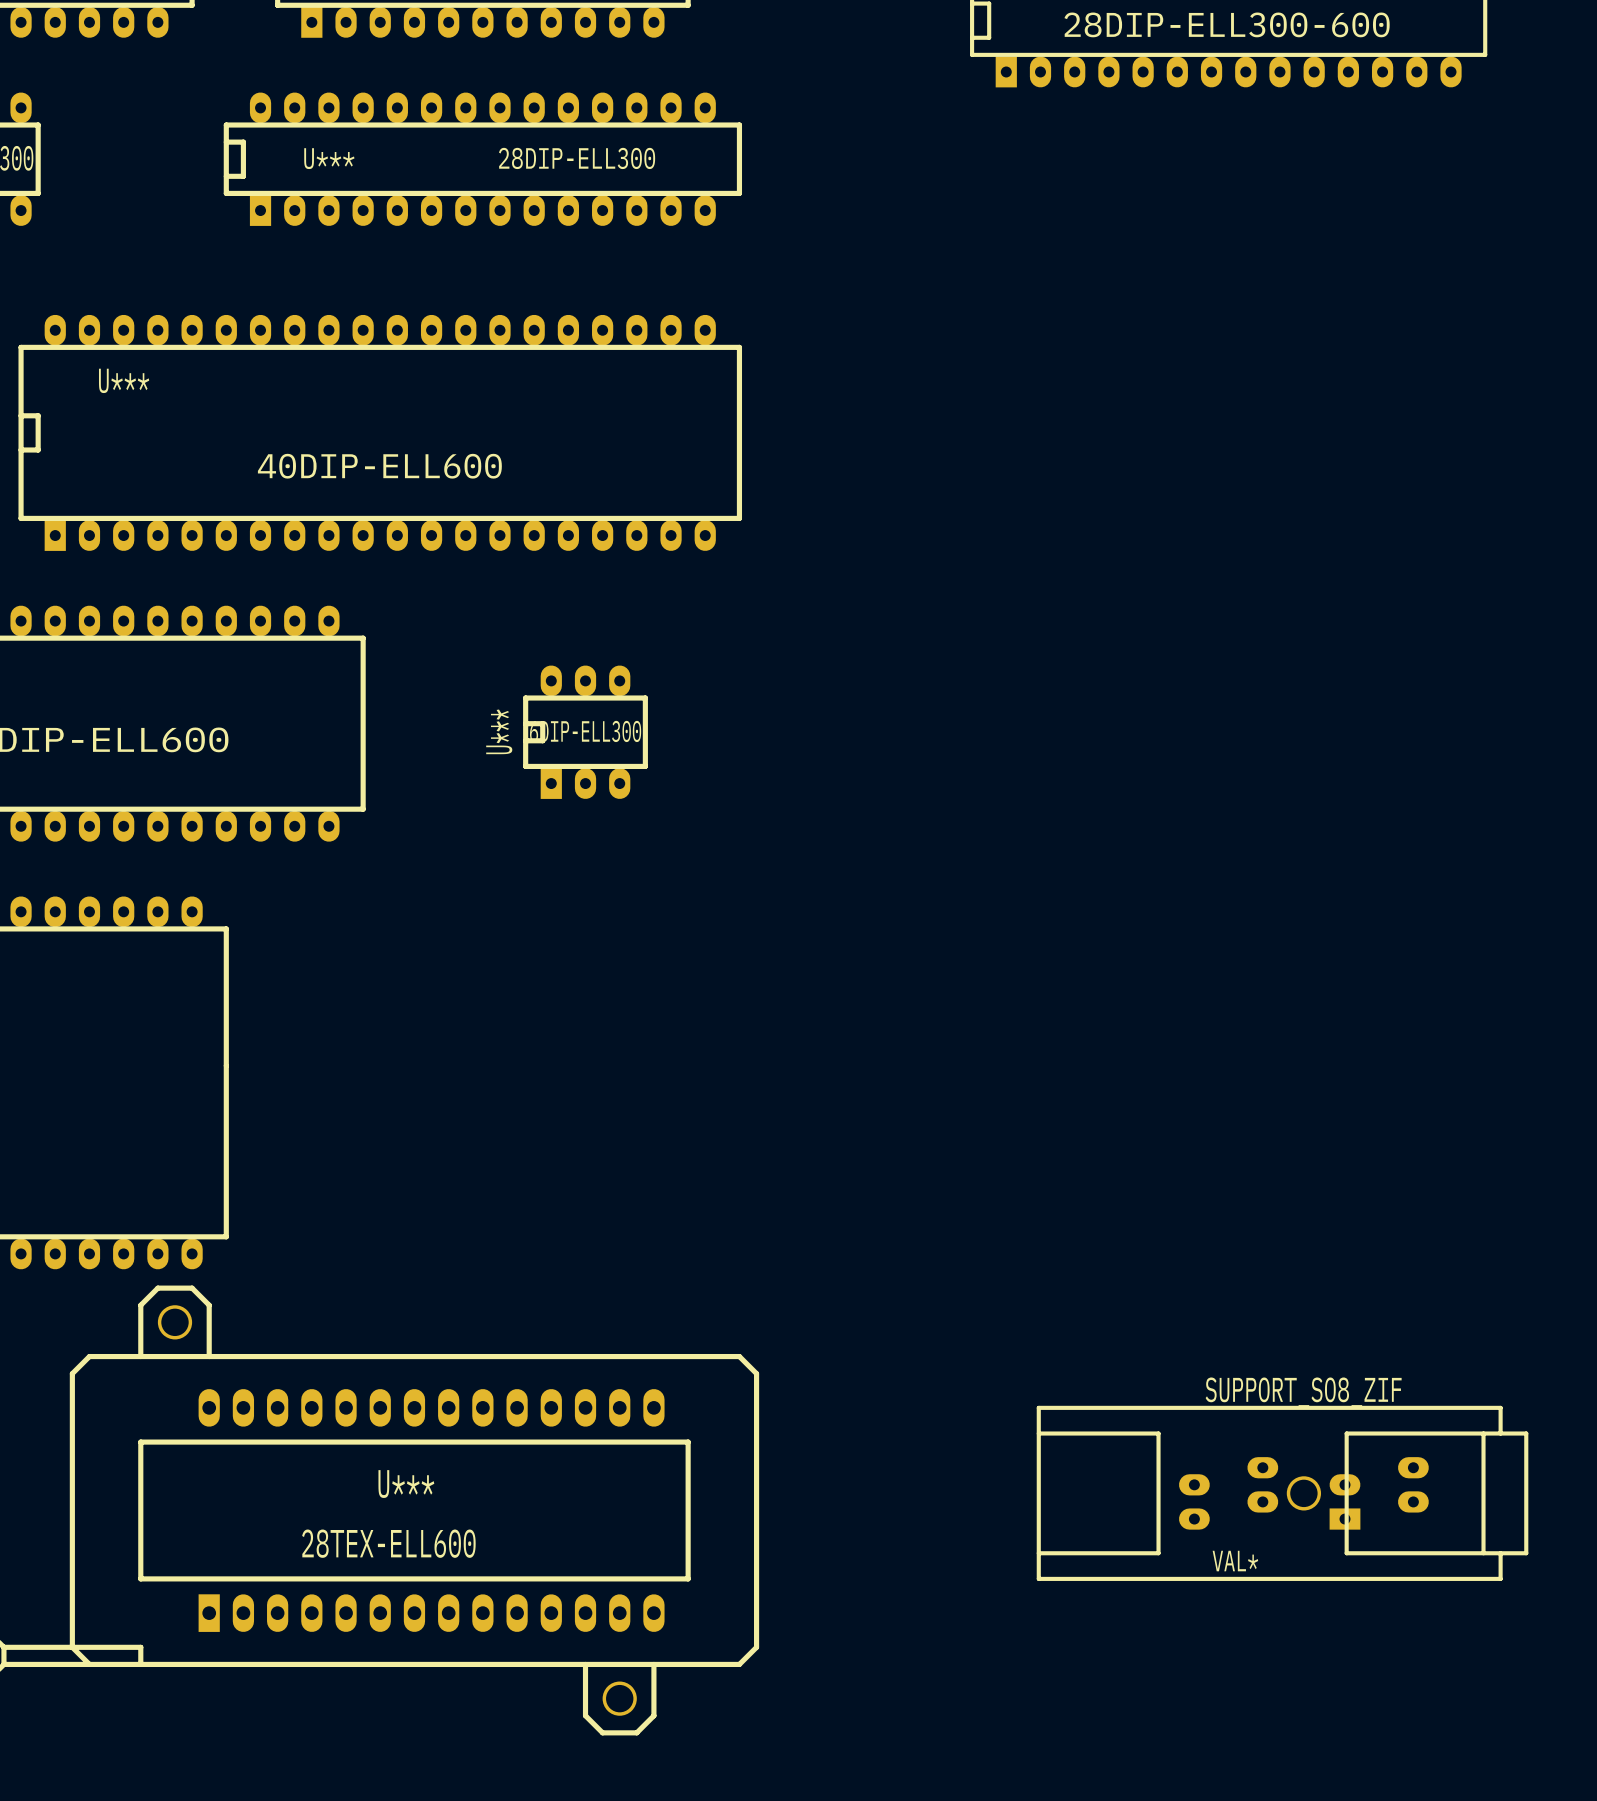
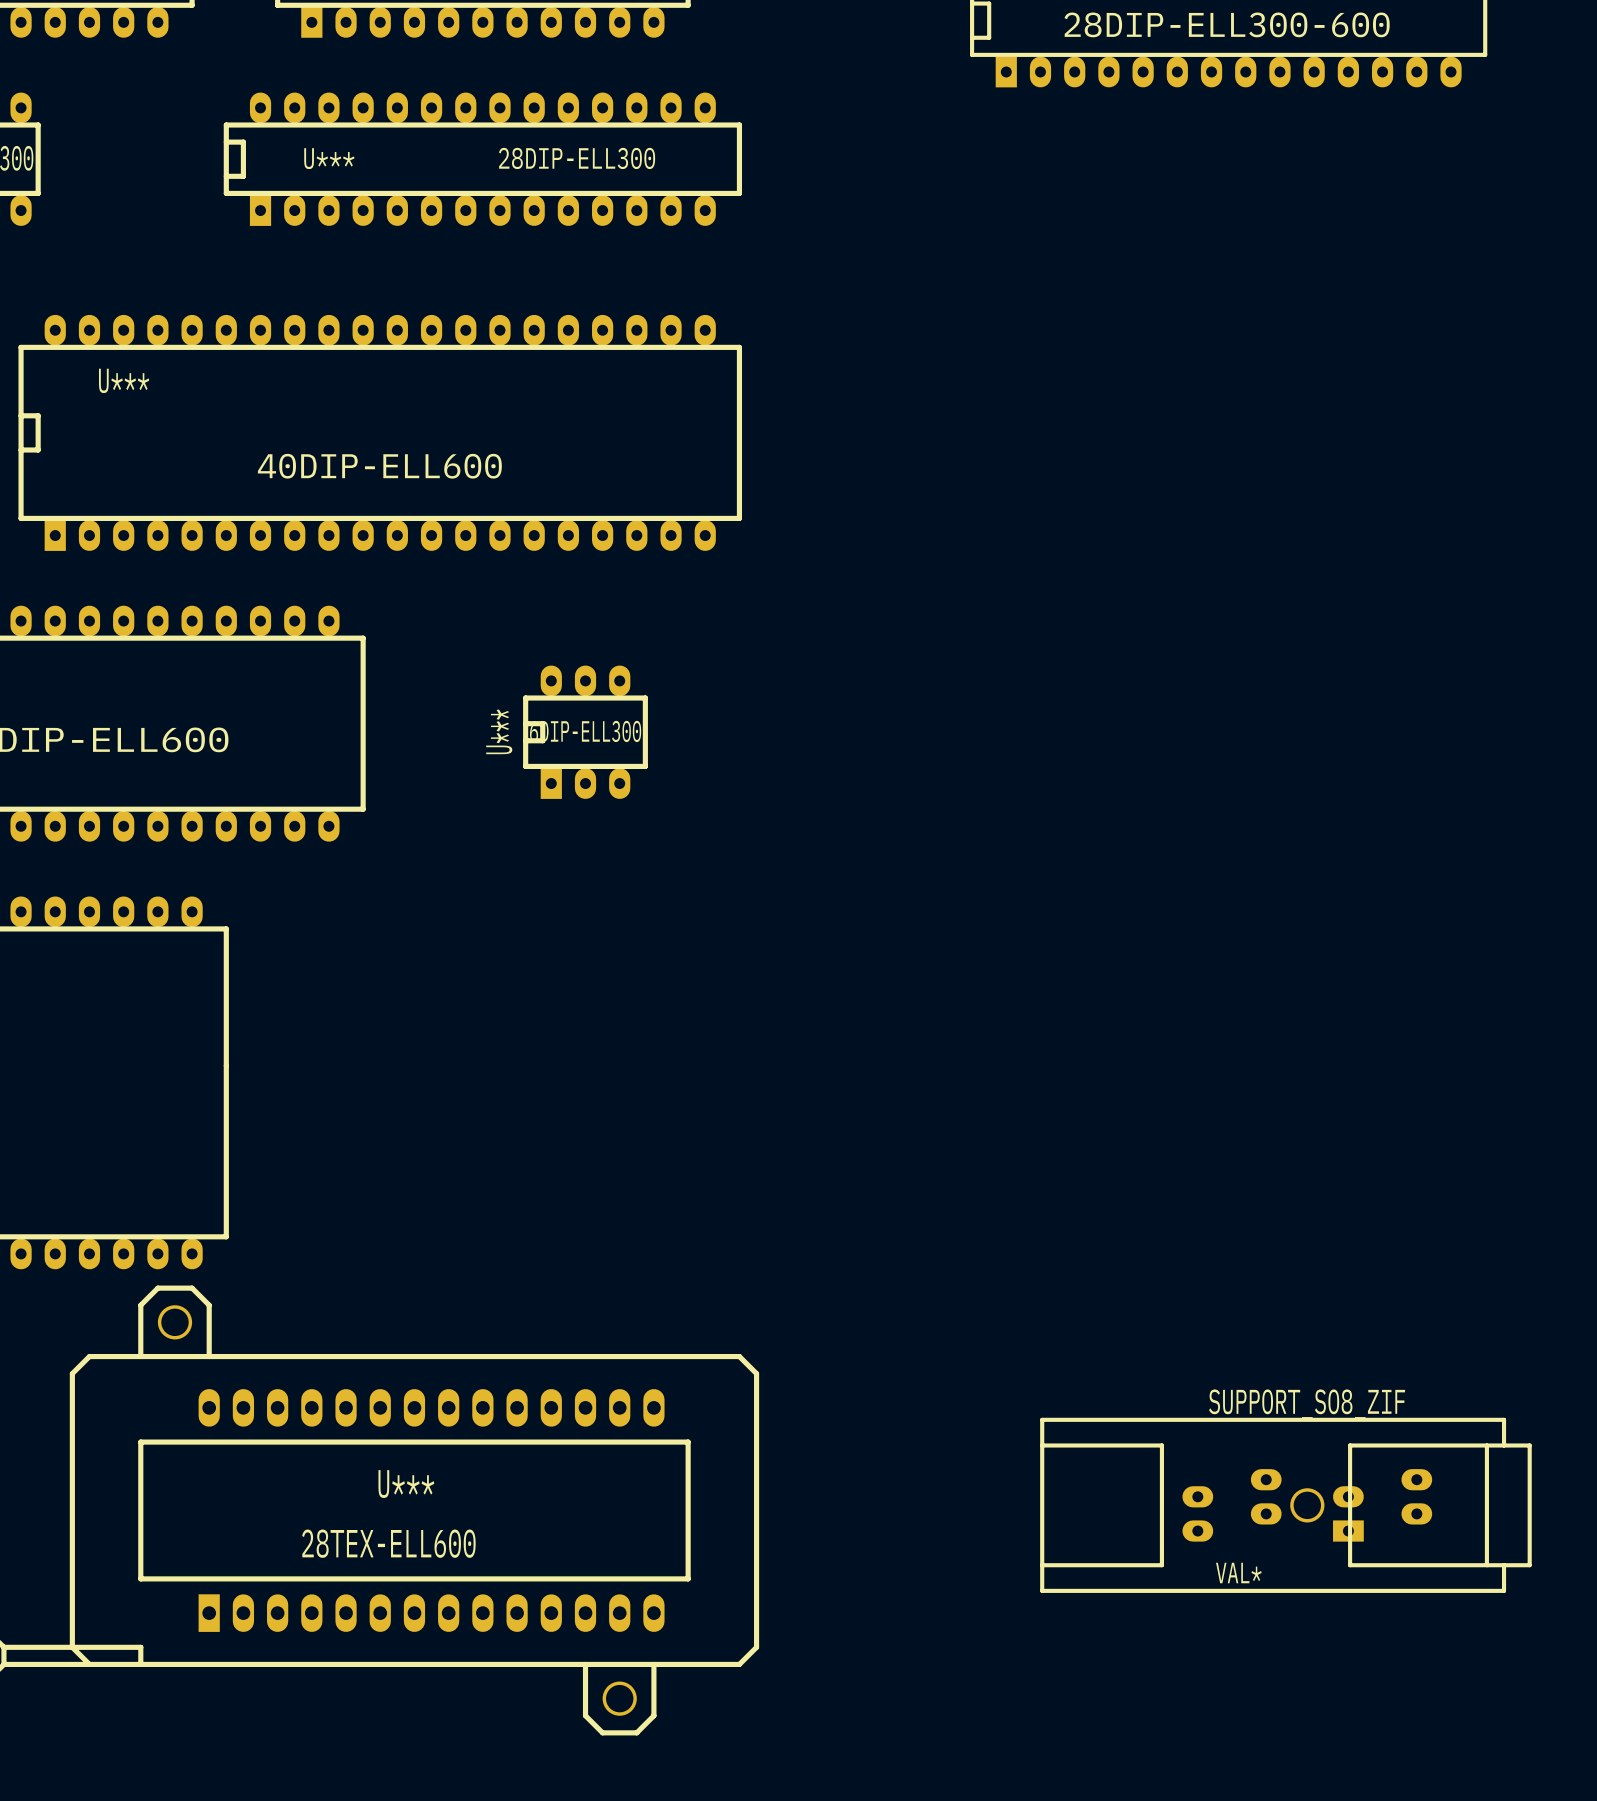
SUPPORT_SO8_ZIF name position: SUPPORT_SO8_ZIF (1303, 1392) -> SUPPORT_SO8_ZIF (1307, 1404)
SUPPORT_SO8_ZIF footprint: [1036, 1405, 1529, 1581] -> [1040, 1417, 1532, 1593]
SUPPORT_SO8_ZIF value position: VAL* (1235, 1561) -> VAL* (1238, 1573)

